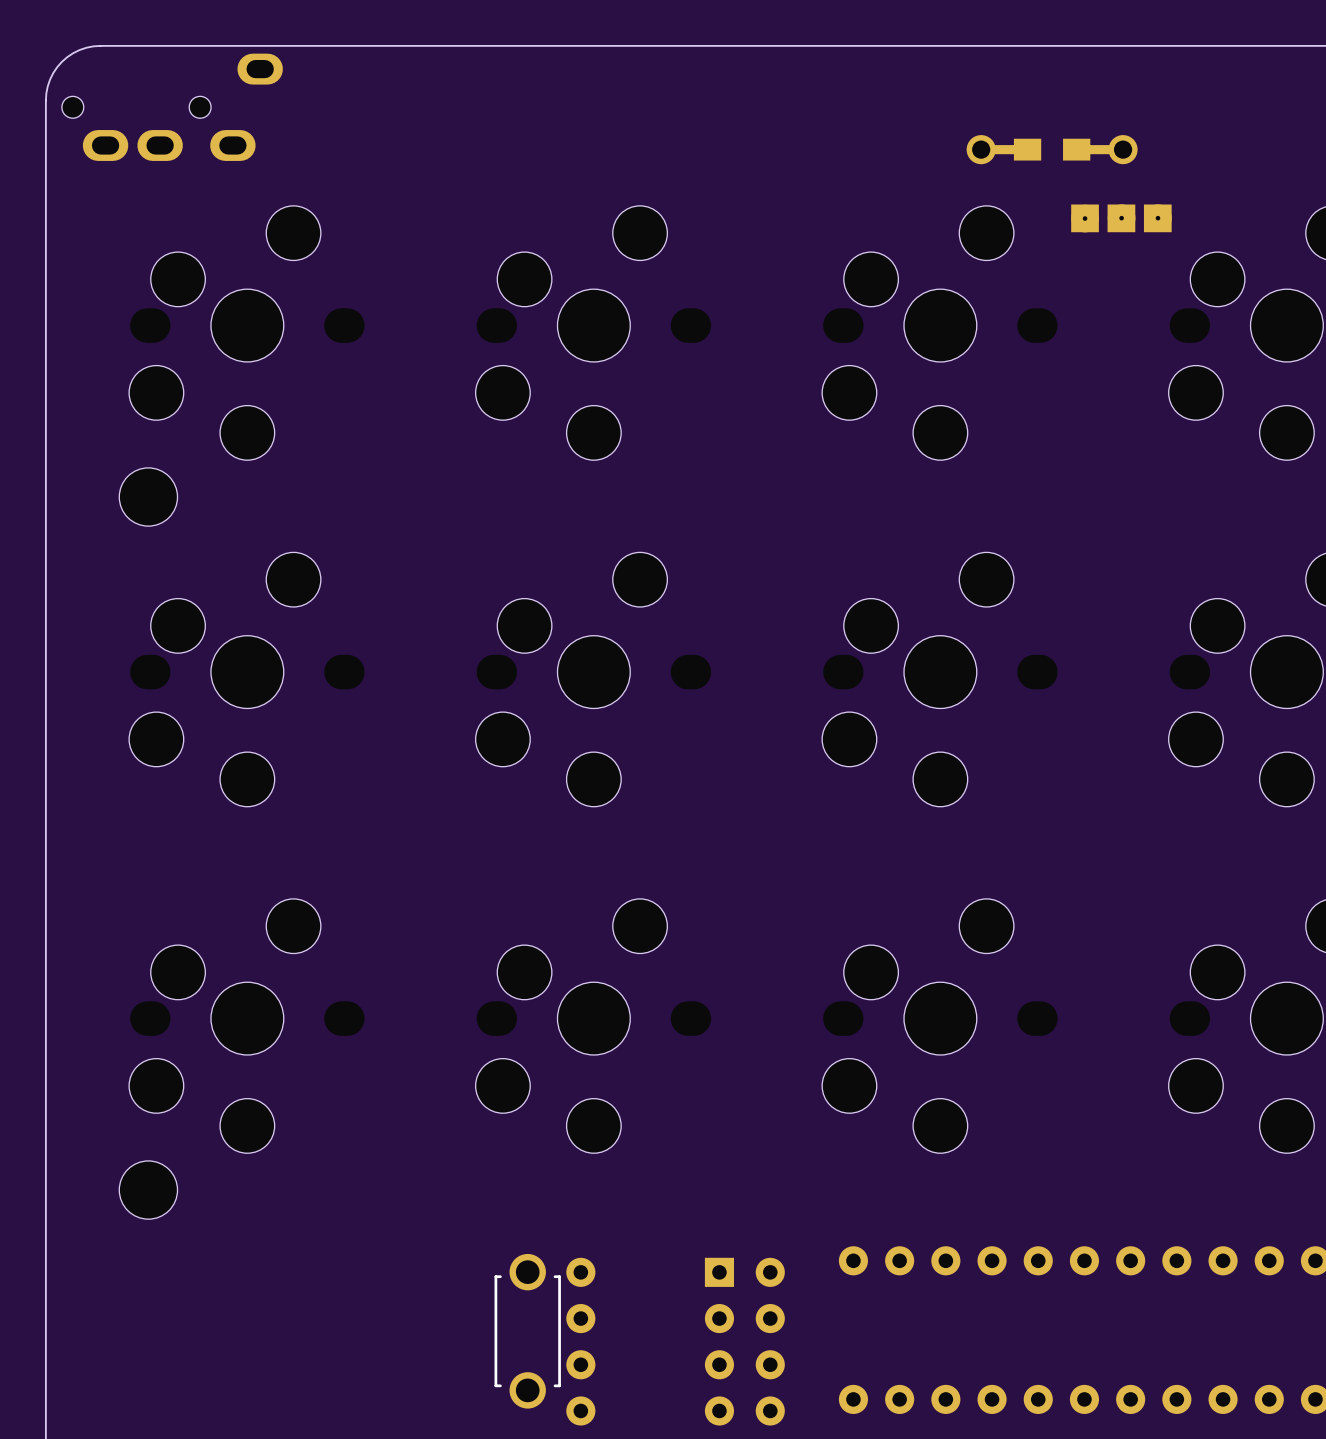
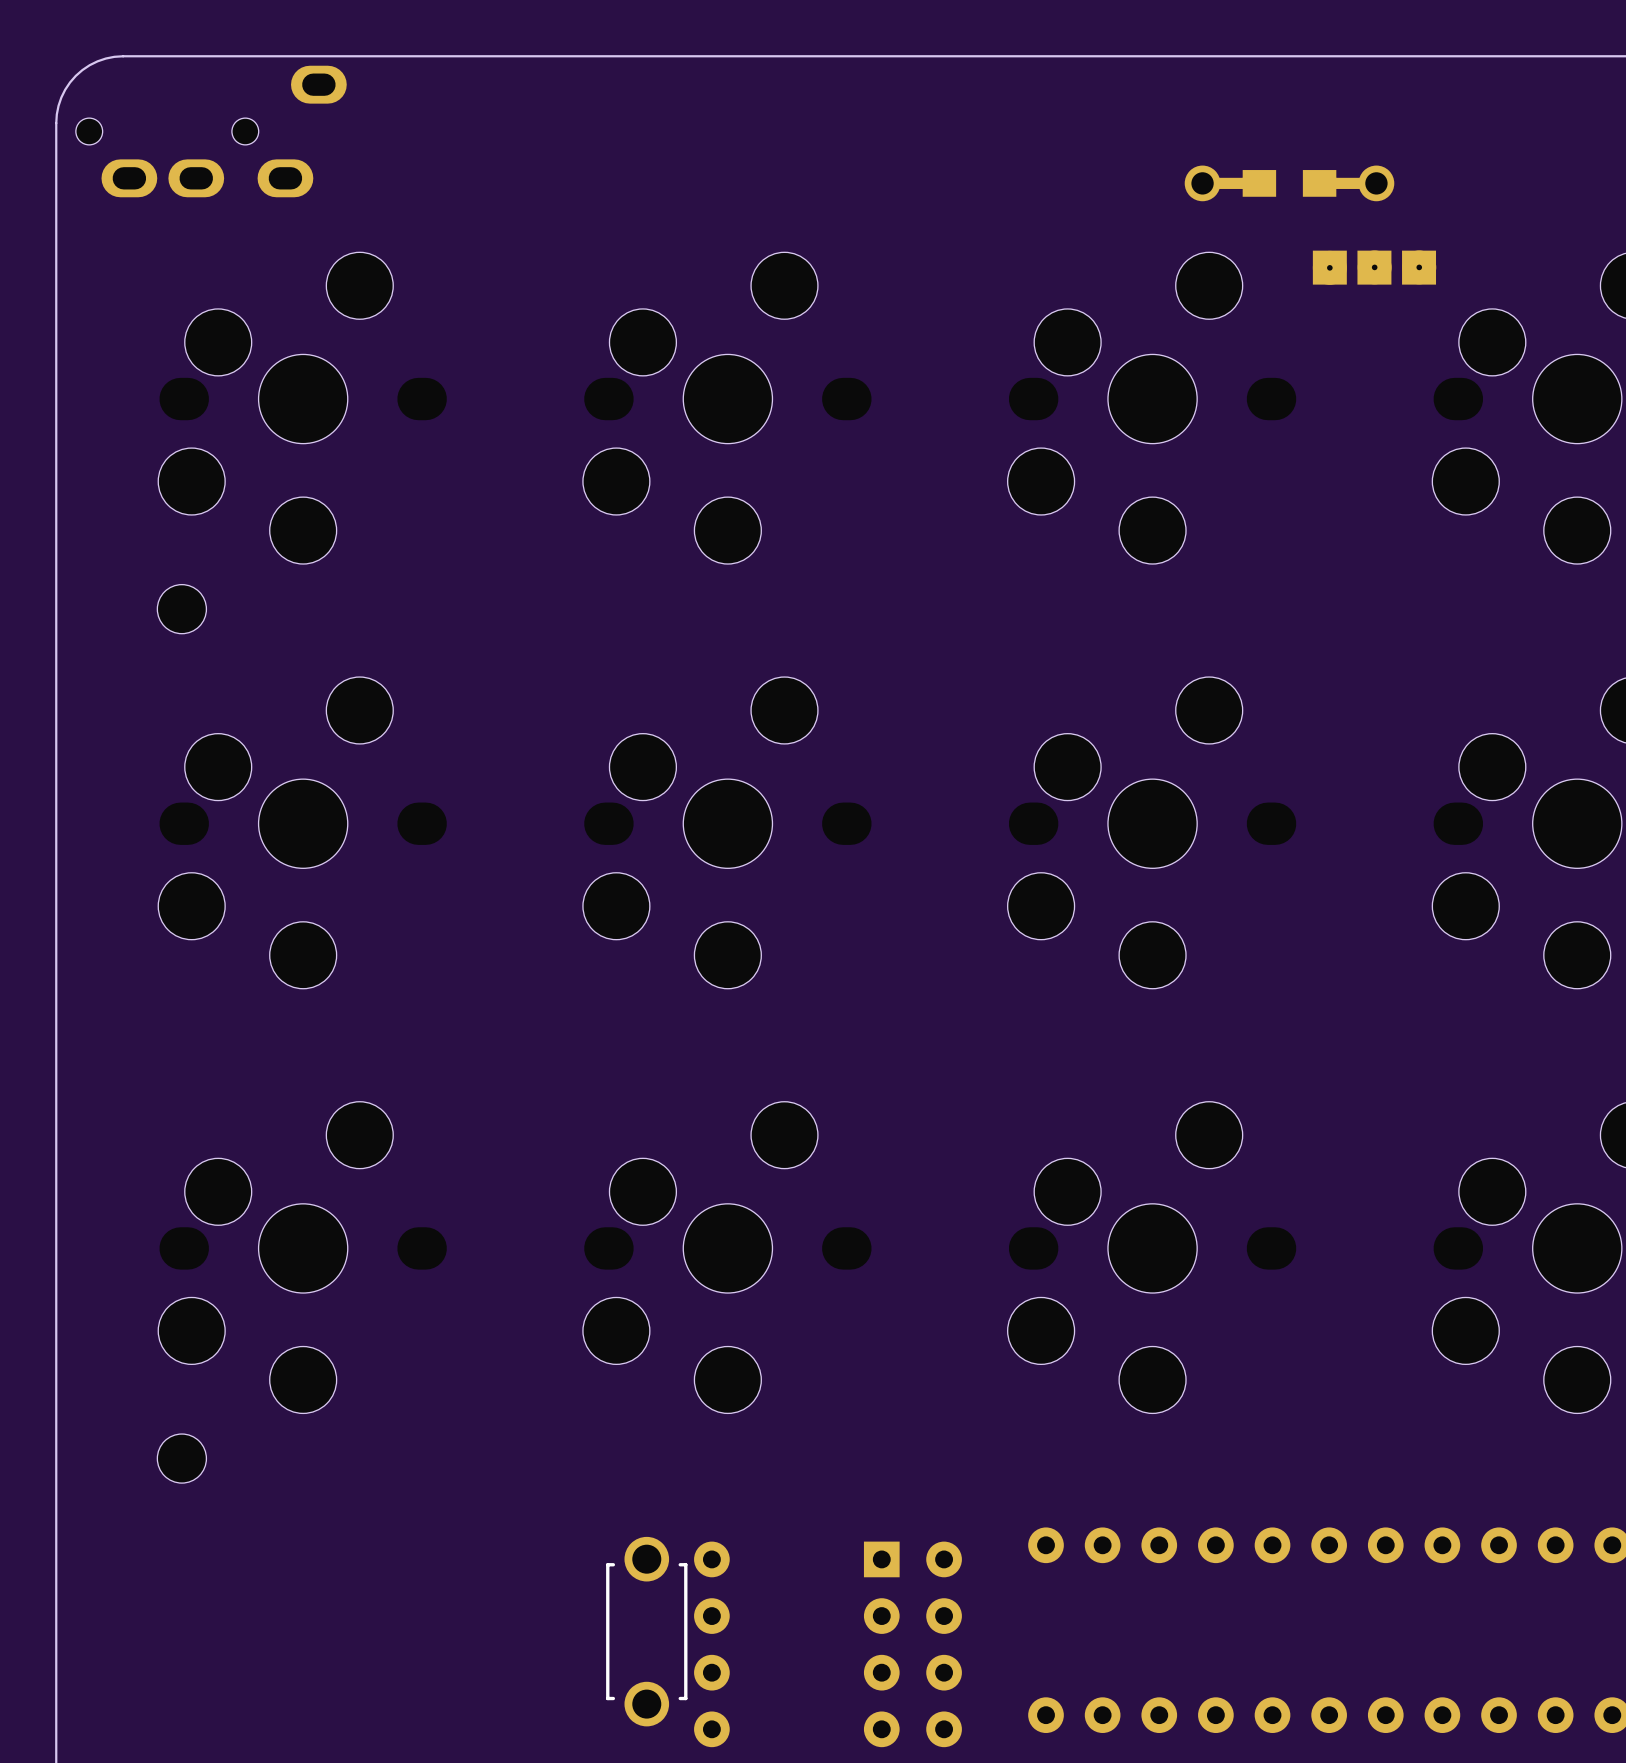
part footprint: [119, 467, 178, 527] -> [157, 584, 207, 634]
part footprint: [119, 1160, 178, 1220] -> [157, 1434, 207, 1484]

